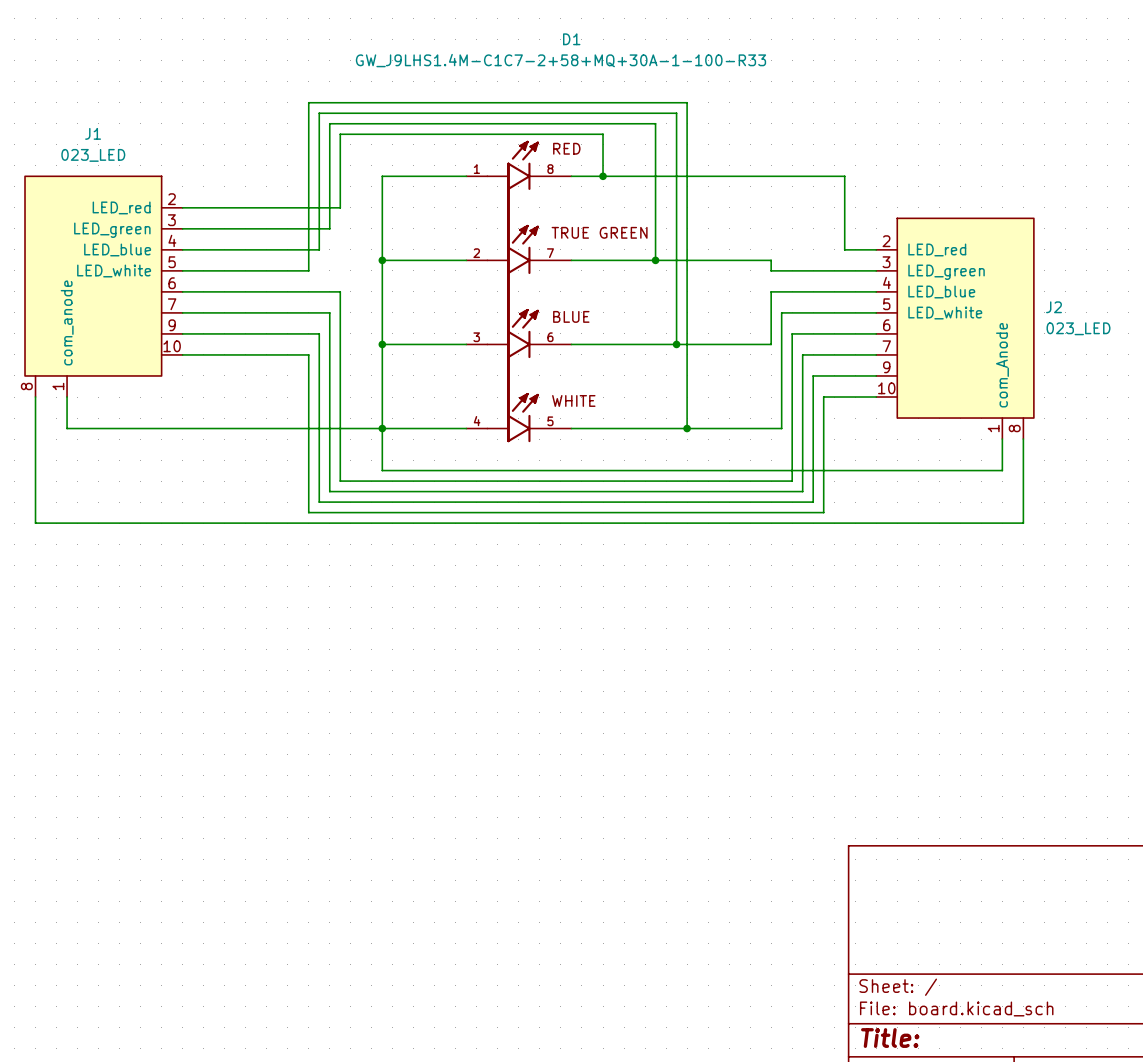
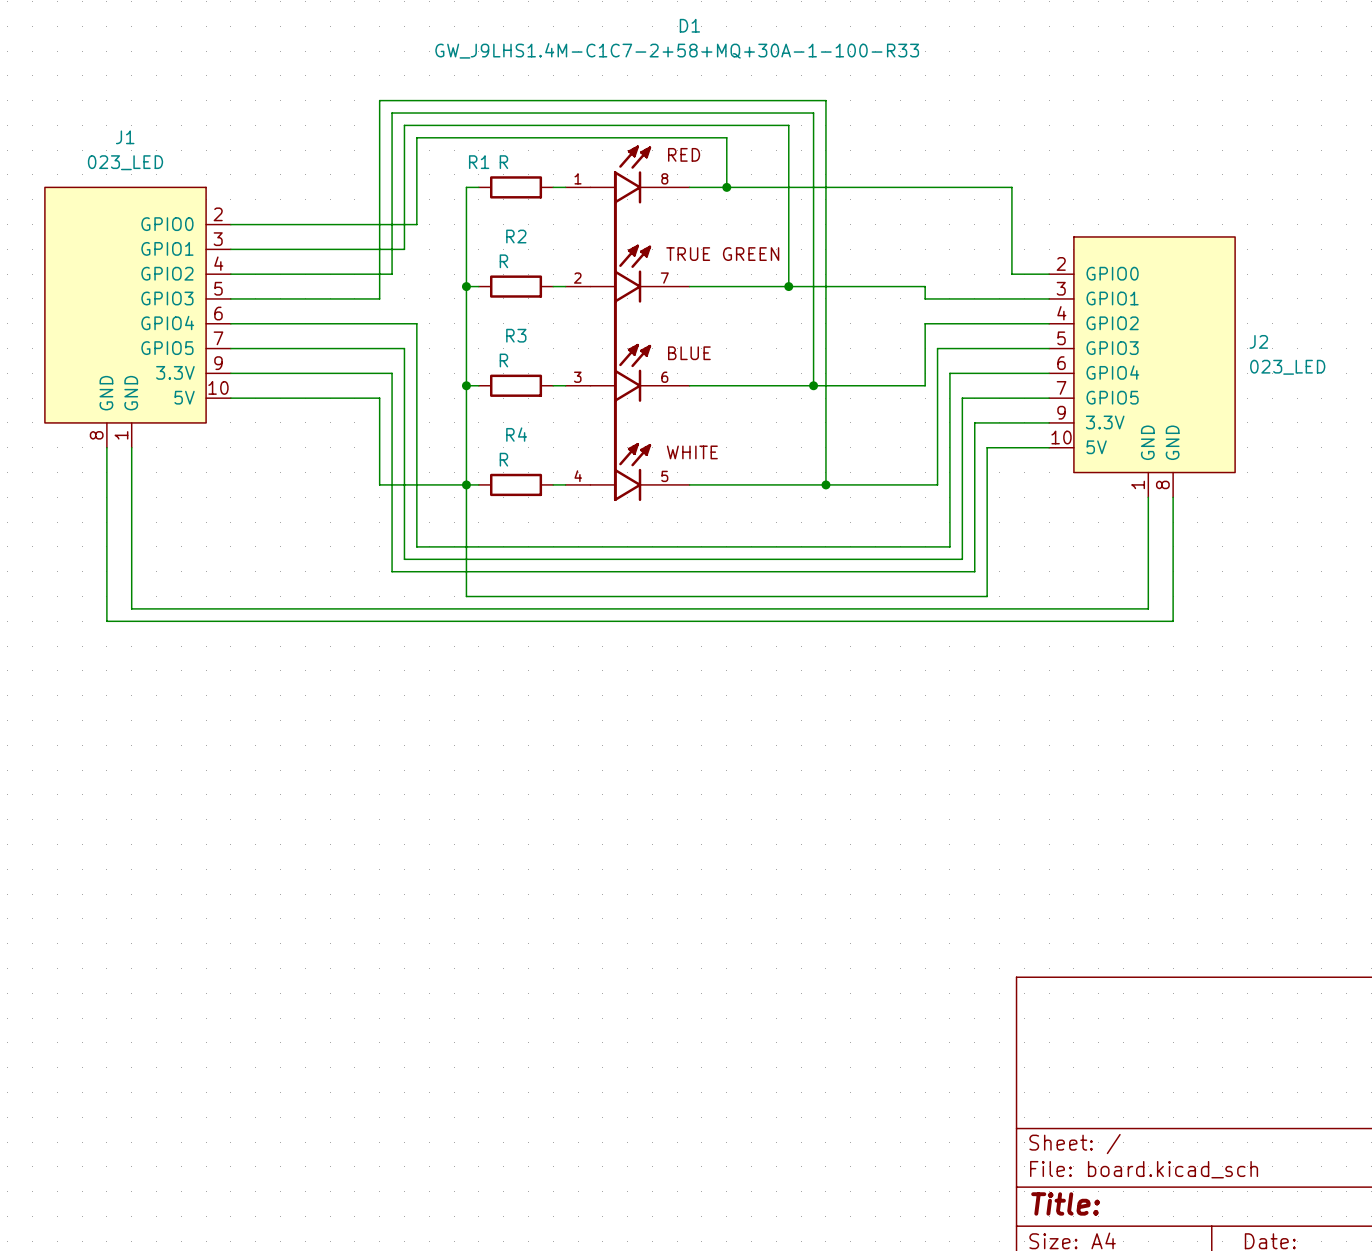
J1 symbol: [25, 176, 183, 398] -> [44, 187, 231, 448]
wire: (392, 176) (455, 176) -> none
R1: none -> R (516, 187)
J2 symbol: [876, 218, 1034, 440] -> [1049, 236, 1236, 498]
wire: (392, 260) (455, 260) -> none
R2: none -> R (516, 286)
wire: (392, 344) (455, 344) -> none
R3: none -> R (516, 385)
wire: (35, 397) (35, 523) (382, 523) -> (466, 534) (466, 596)
wire: (67, 397) (67, 428) (308, 428) (308, 512) (823, 512) -> none
wire: none -> (106, 447) (106, 621) (1173, 621) (1173, 497)
wire: none -> (131, 447) (131, 608) (1148, 608) (1148, 497)
wire: (392, 428) (455, 428) -> none
R4: none -> R (516, 484)
wire: (1002, 439) (1002, 470) (382, 470) -> none
wire: (1023, 439) (1023, 523) (823, 523) -> (987, 584) (987, 596)

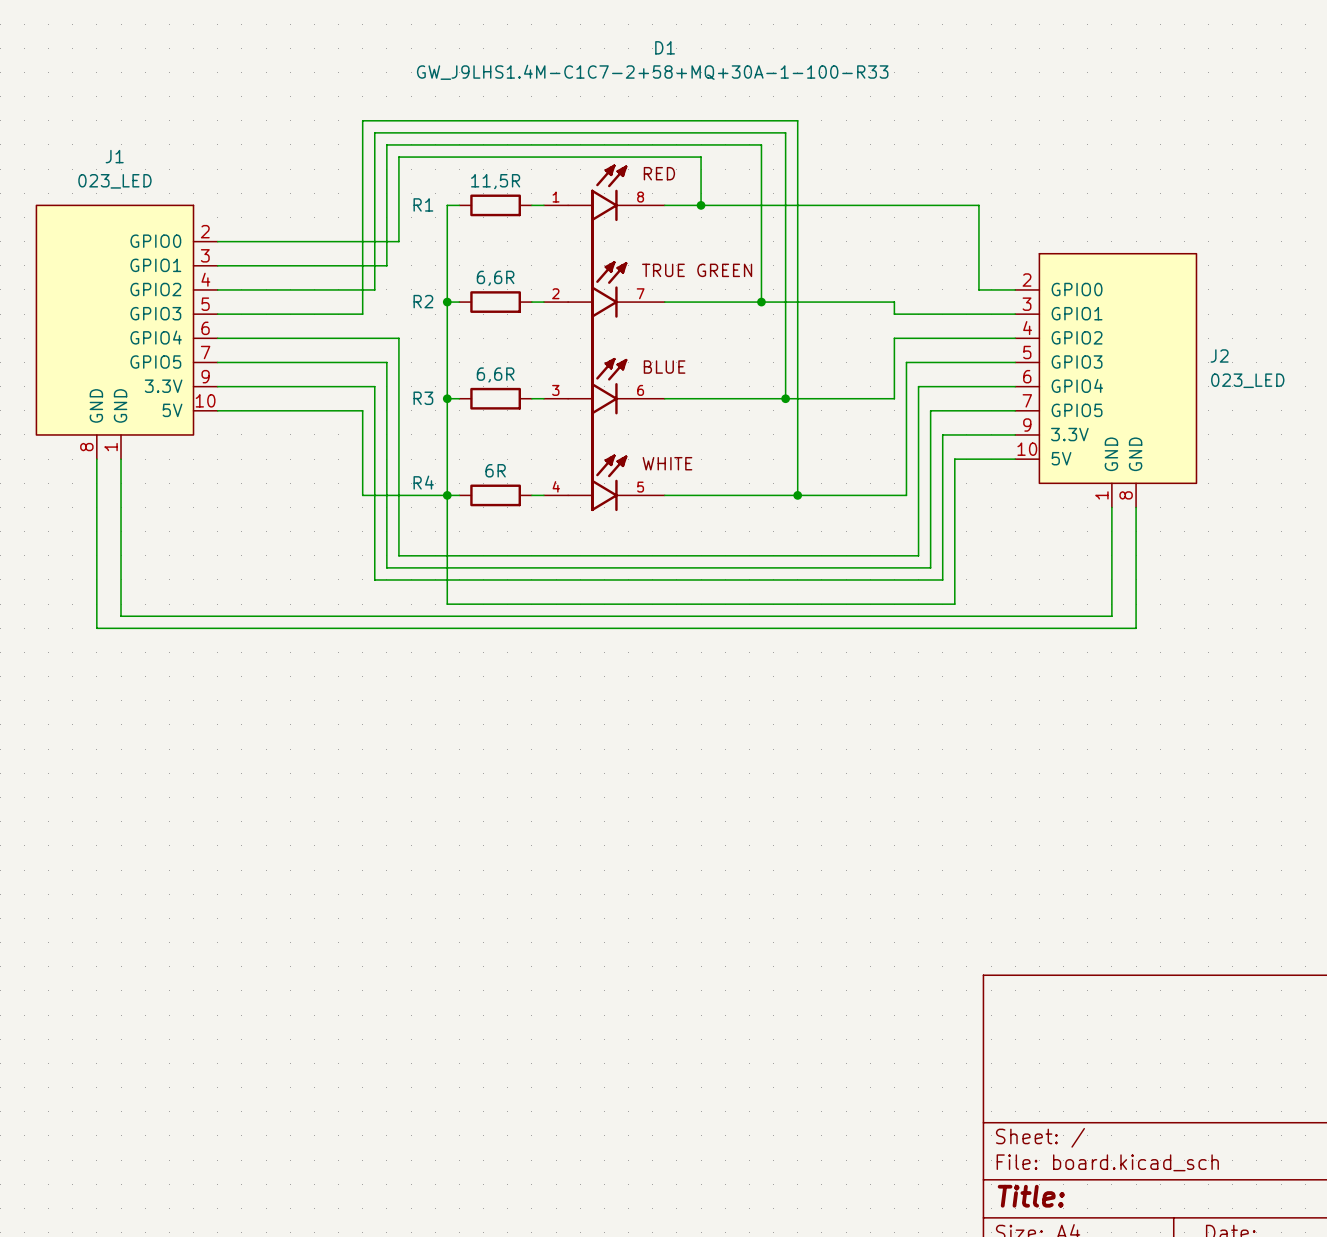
R1 name position: R1 (479, 162) -> R1 (423, 204)
R1 value: R (503, 162) -> 11,5R (495, 181)
R2 name position: R2 (516, 236) -> R2 (423, 301)
R2 value: R (503, 261) -> 6,6R (495, 278)
R3 name position: R3 (516, 335) -> R3 (423, 398)
R3 value: R (503, 360) -> 6,6R (495, 374)
R4 name position: R4 (516, 434) -> R4 (423, 482)
R4 value: R (503, 459) -> 6R (495, 470)

